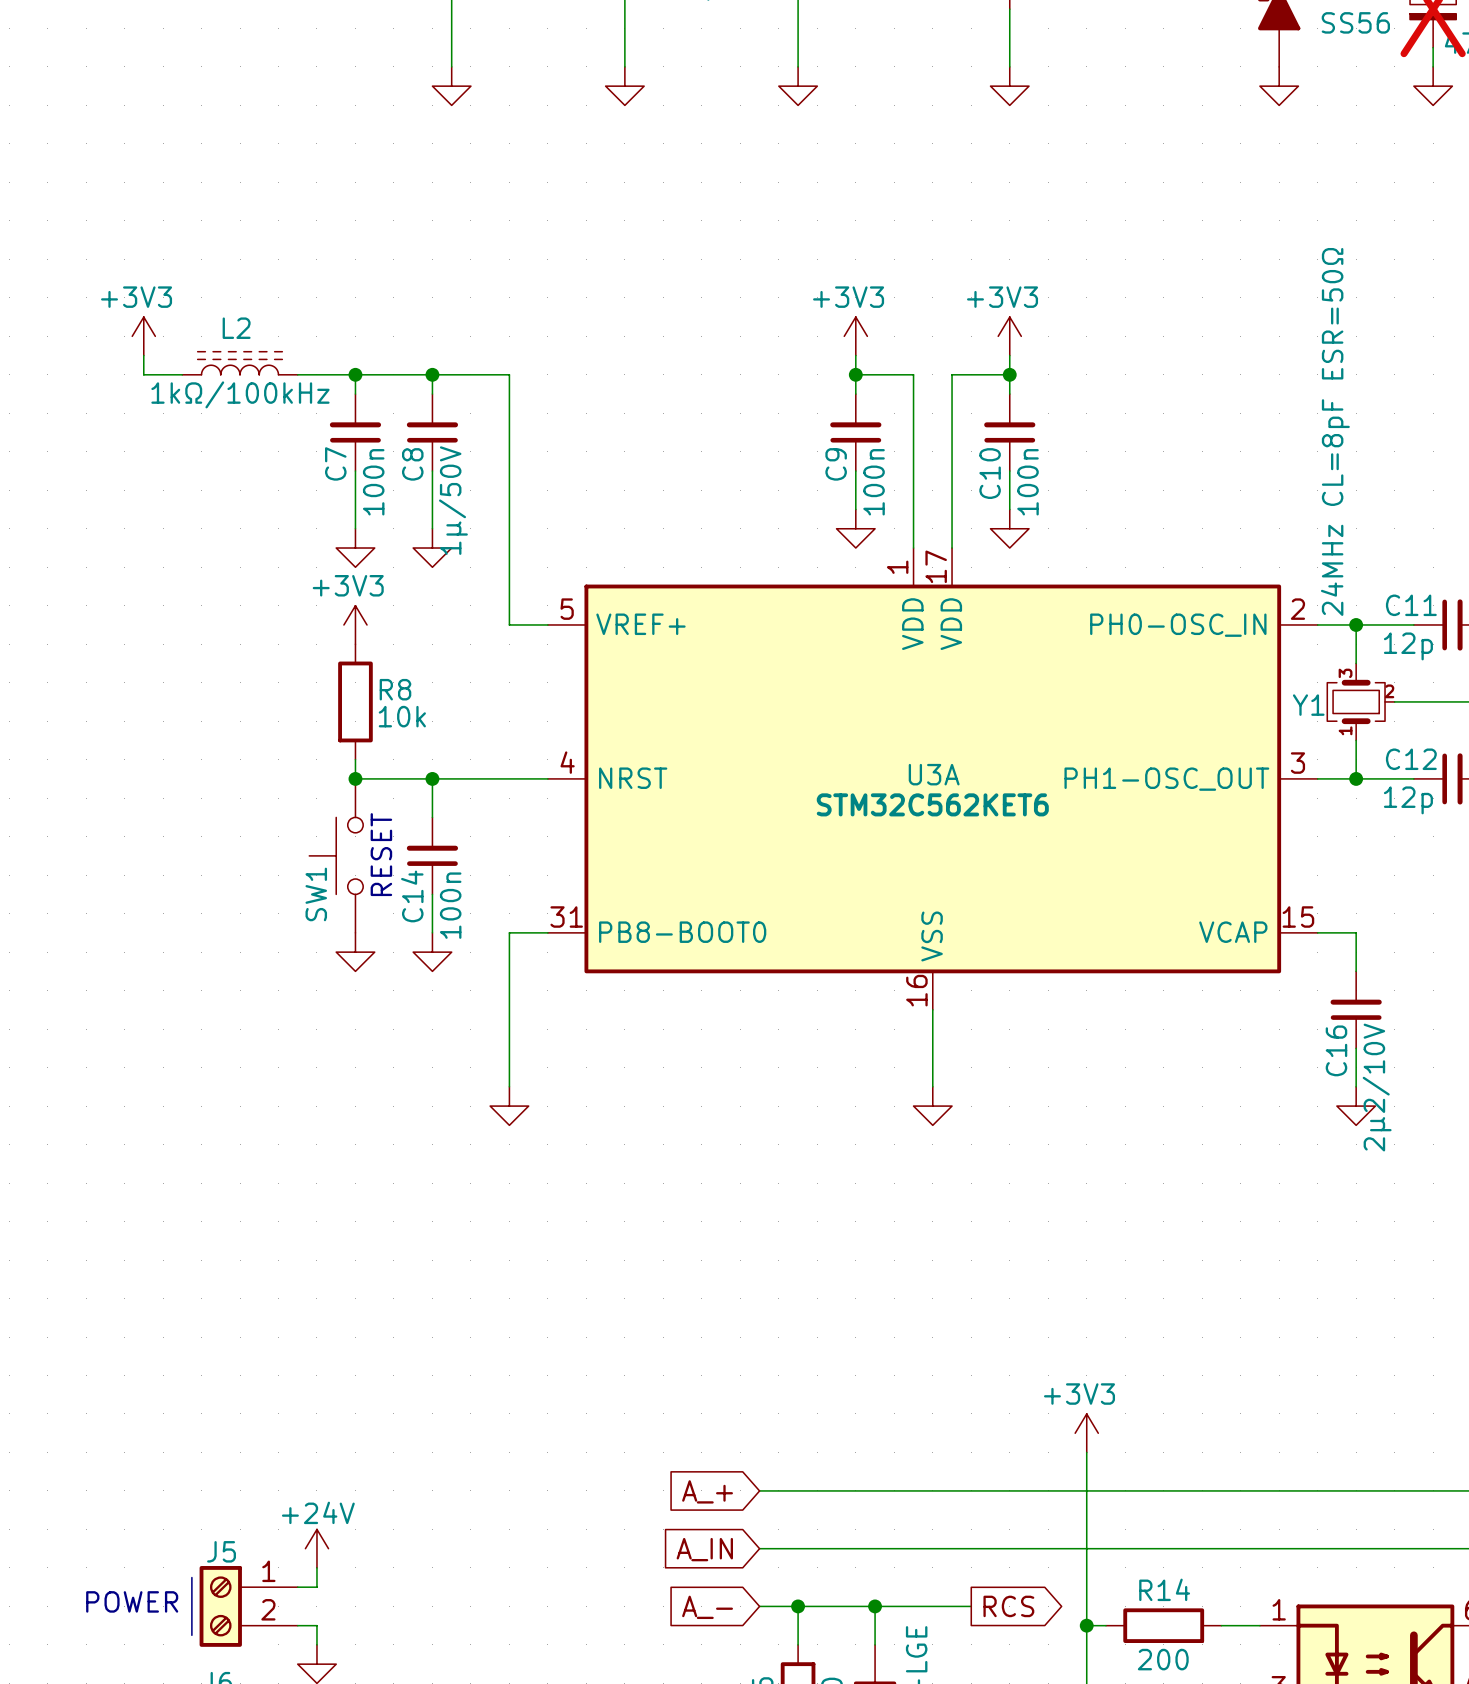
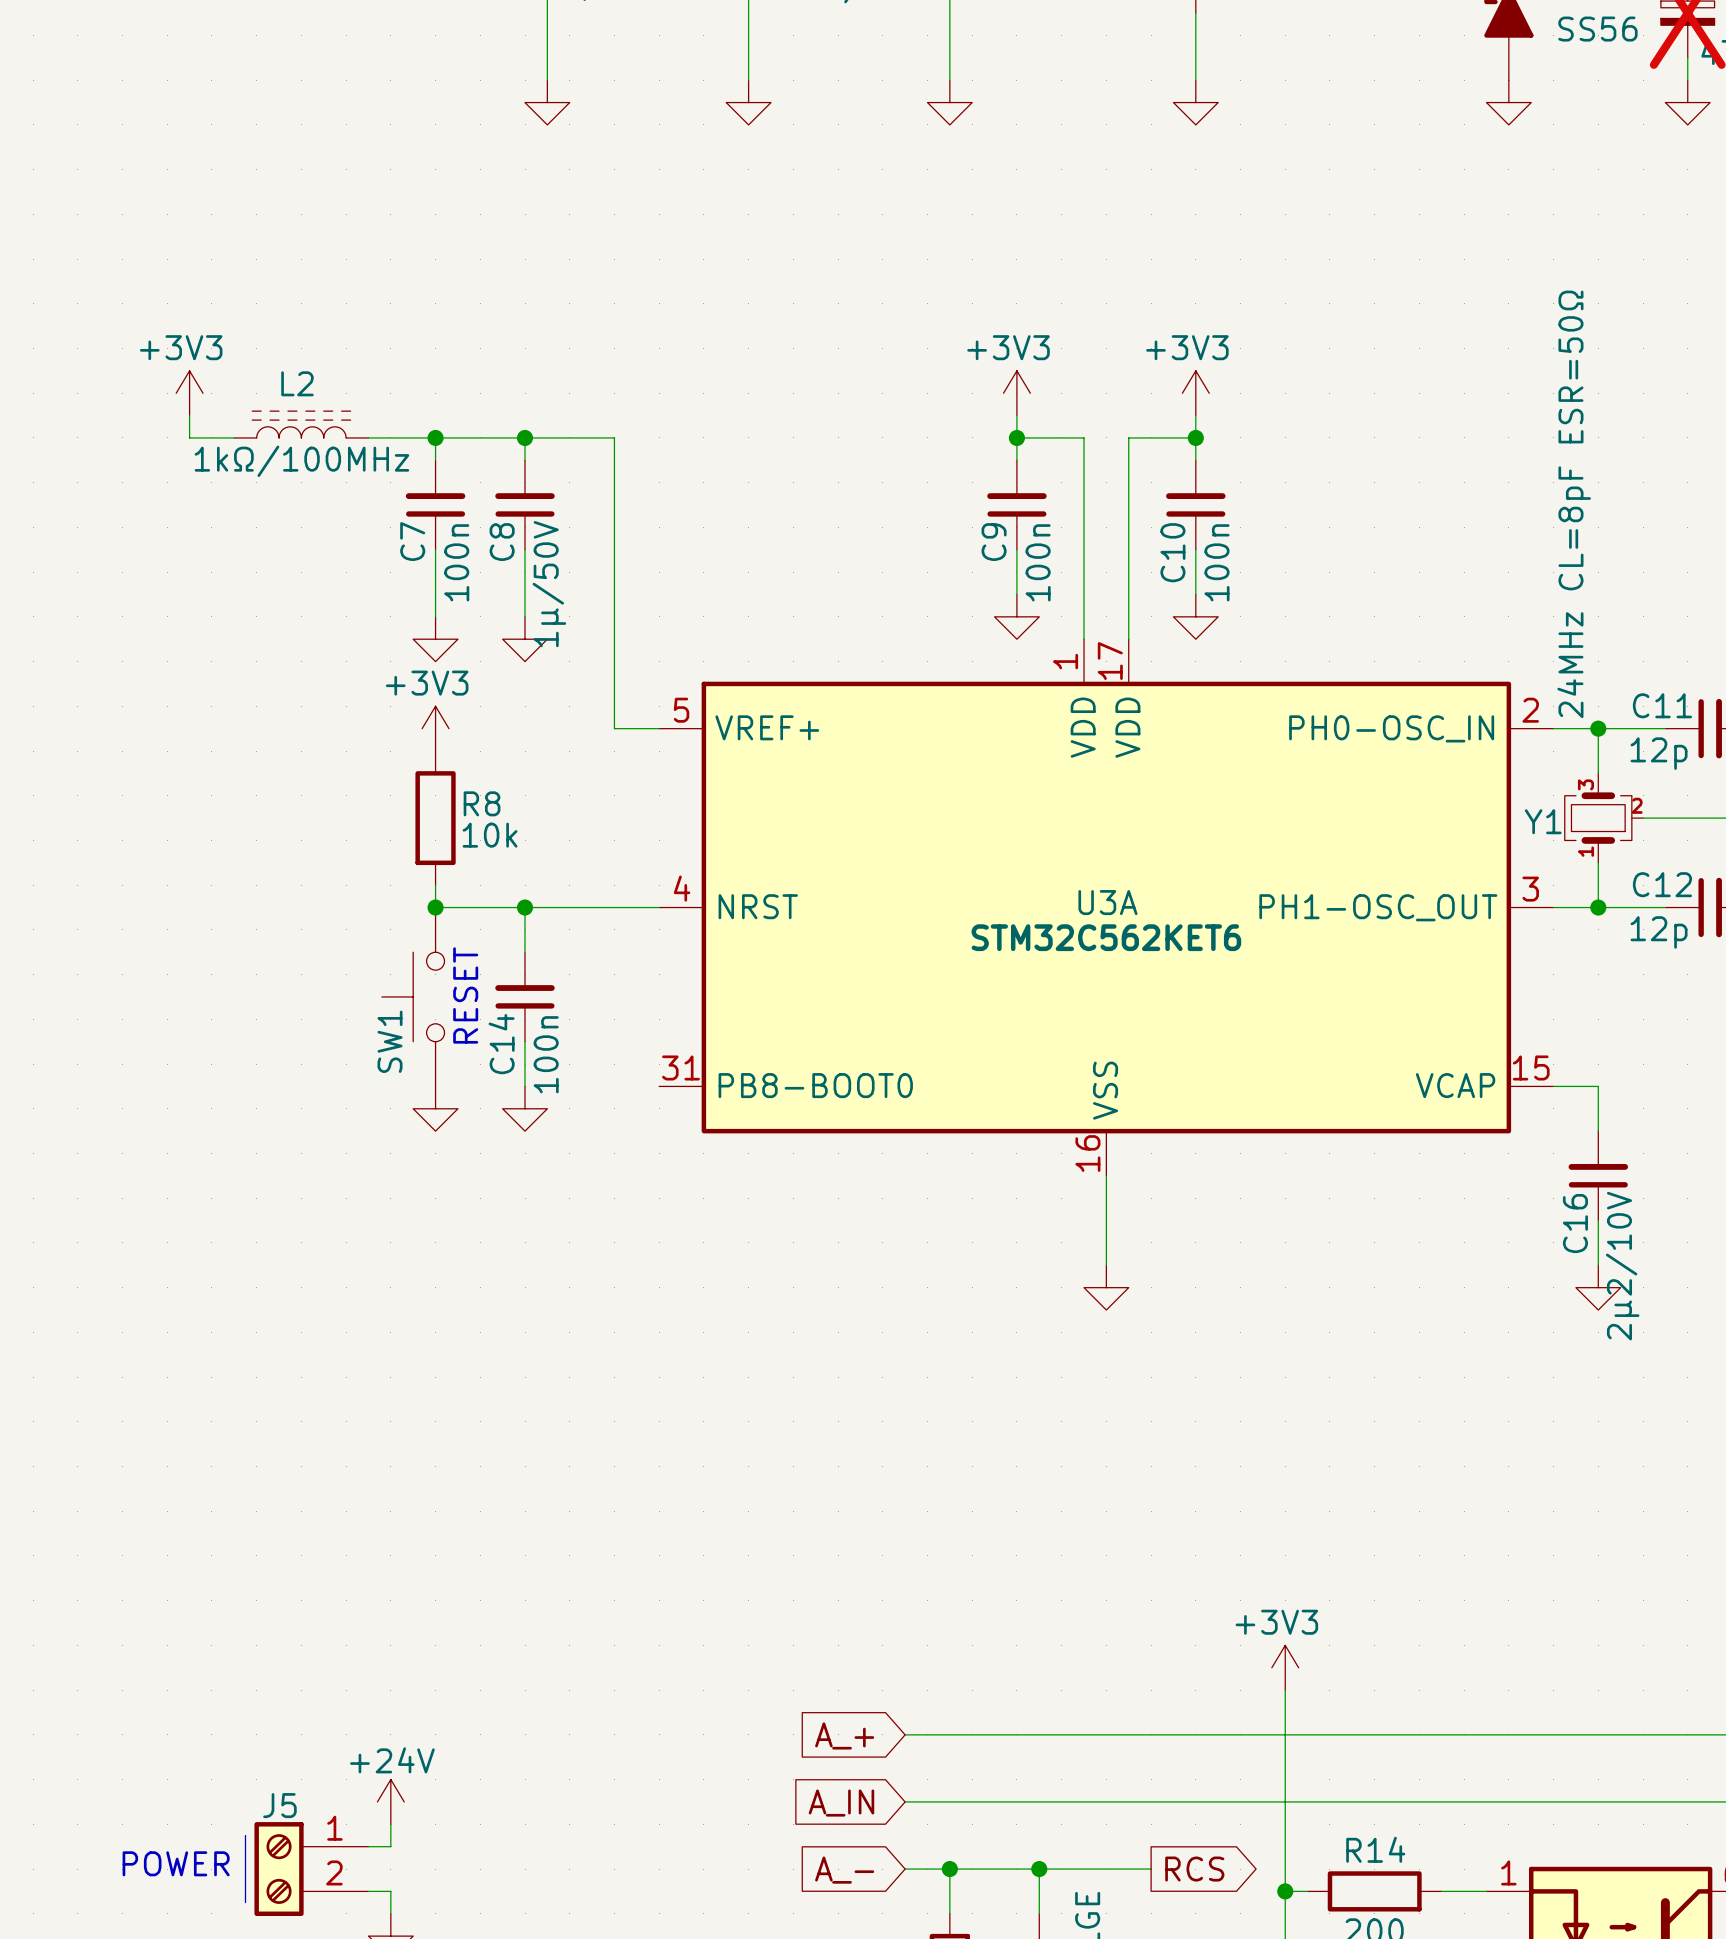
L2 value: 1kΩ/100kHz (240, 394) -> 1kΩ/100MHz (301, 461)
wire: (547, 932) (509, 932) (509, 1086) -> none
power symbol: (509, 1106) -> none

